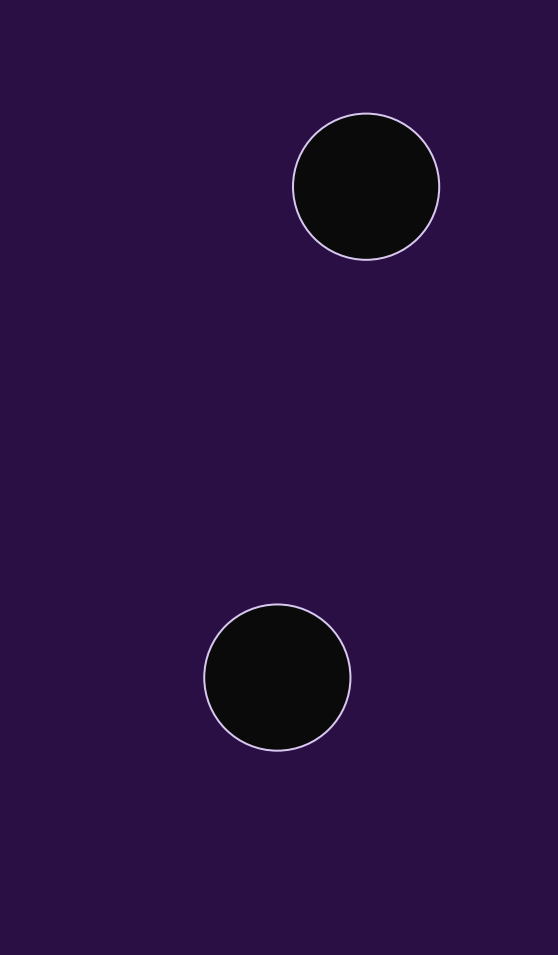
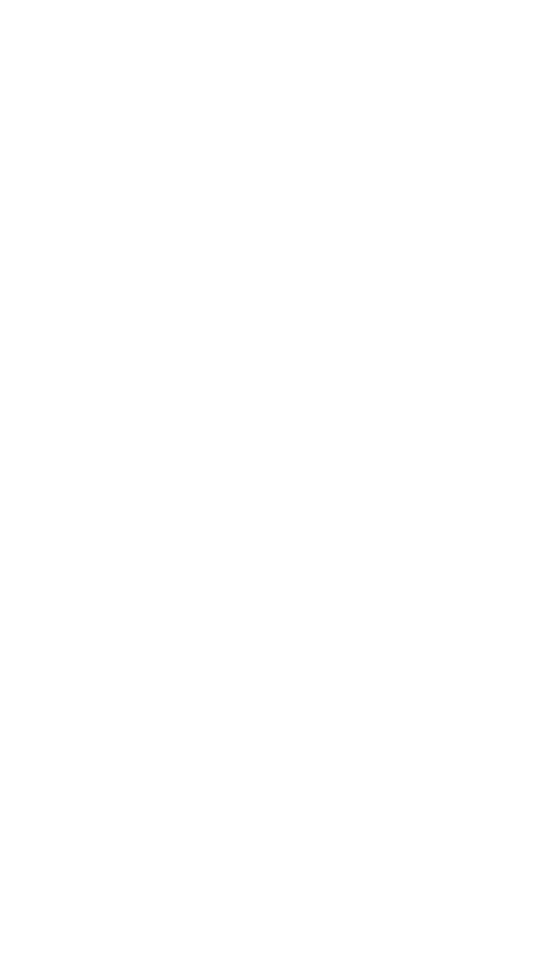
part: (366, 186) -> none
part: (277, 677) -> none

